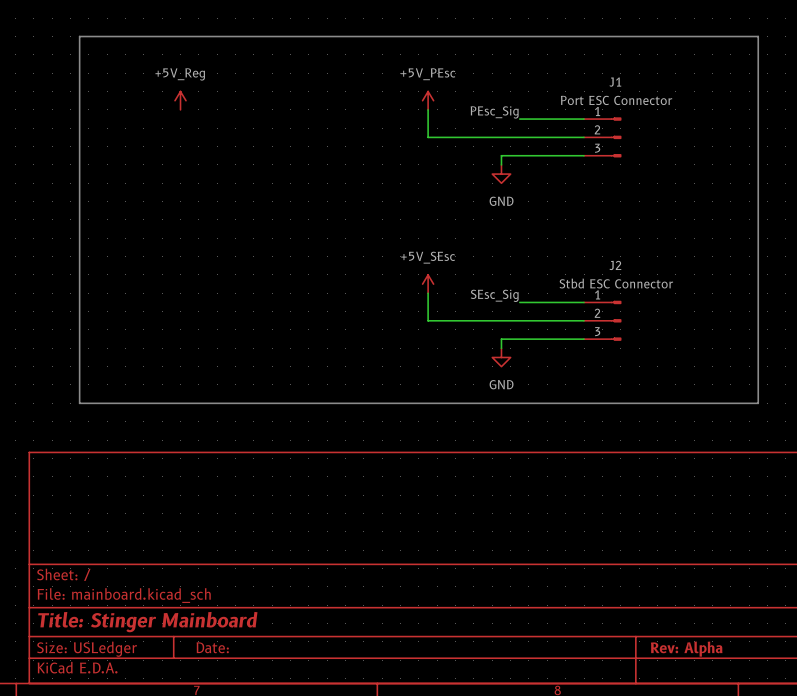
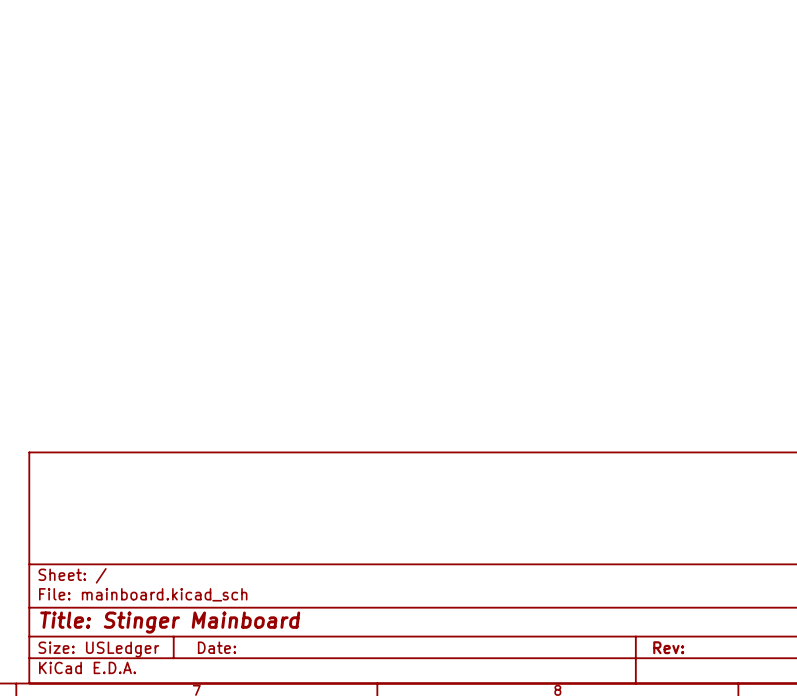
line: (79, 36) (758, 36) (758, 403) (79, 403) (79, 36) -> none
power symbol: +5V_Reg (180, 100) -> none
power symbol: +5V_PEsc (428, 100) -> none
wire: (428, 109) (428, 137) (584, 137) -> none
label: PEsc_Sig (494, 112) -> none
wire: (519, 119) (584, 119) -> none
J1: Port ESC Connector (602, 137) -> none
wire: (584, 155) (501, 155) (501, 164) -> none
power symbol: GND (501, 174) -> none
power symbol: +5V_SEsc (428, 284) -> none
wire: (428, 293) (428, 320) (584, 320) -> none
label: SEsc_Sig (494, 295) -> none
wire: (519, 302) (584, 302) -> none
J2: Stbd ESC Connector (602, 320) -> none
wire: (584, 339) (501, 339) (501, 348) -> none
power symbol: GND (501, 357) -> none
title block: Rev: Alpha (686, 649) -> Rev: (668, 647)

